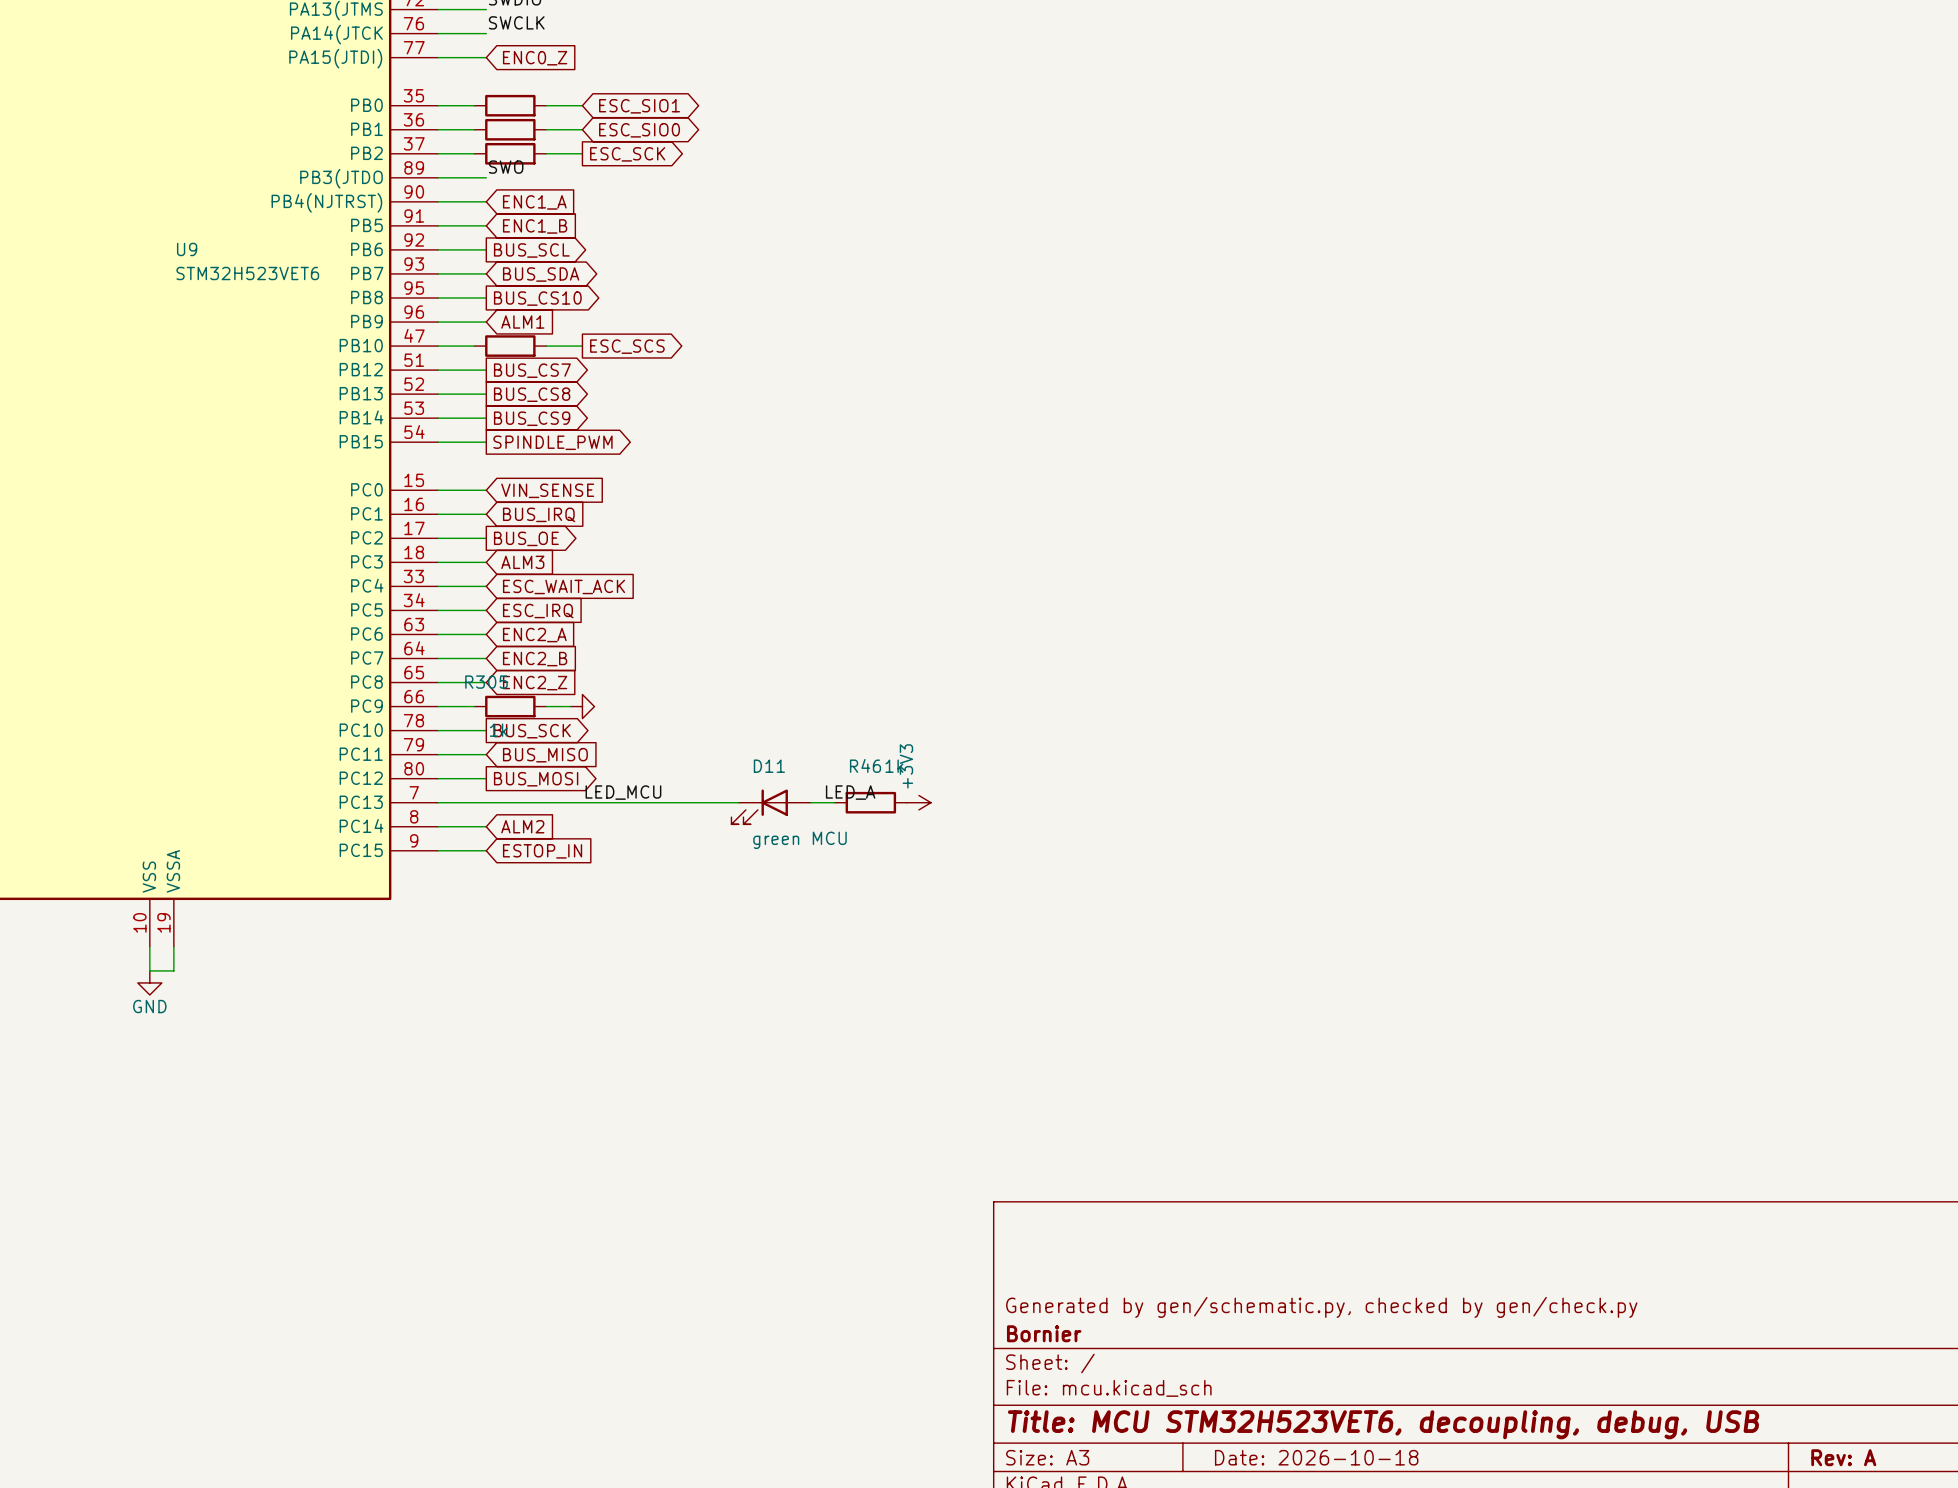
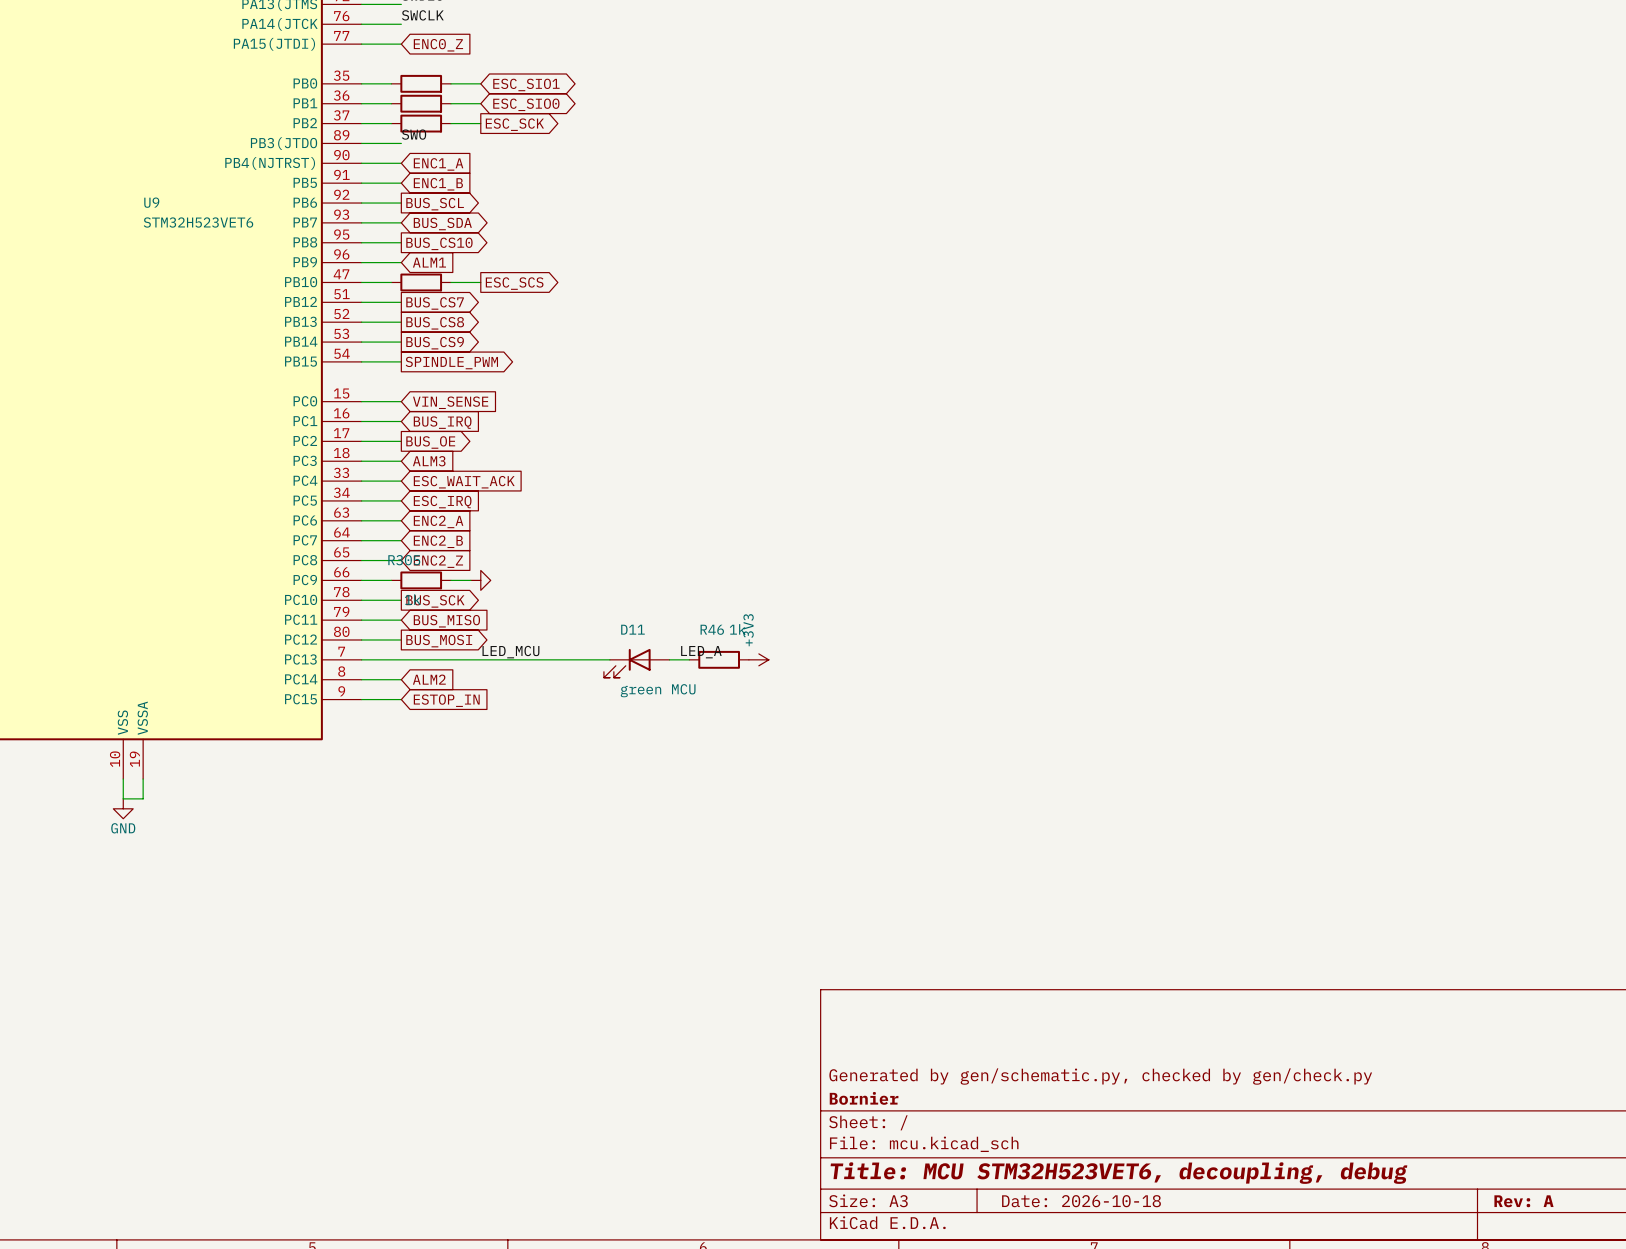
title block: Title: MCU STM32H523VET6, decoupling, debug, USB (1383, 1424) -> Title: MCU STM32H523VET6, decoupling, debug (1118, 1173)

